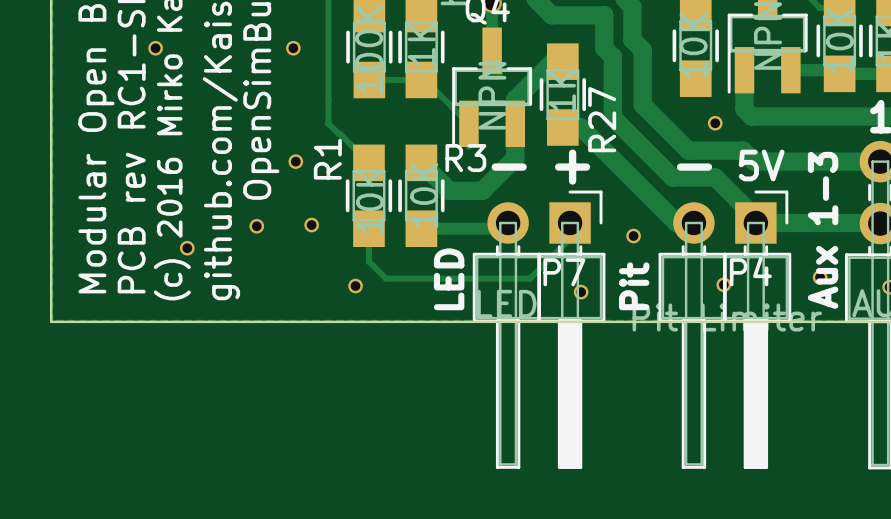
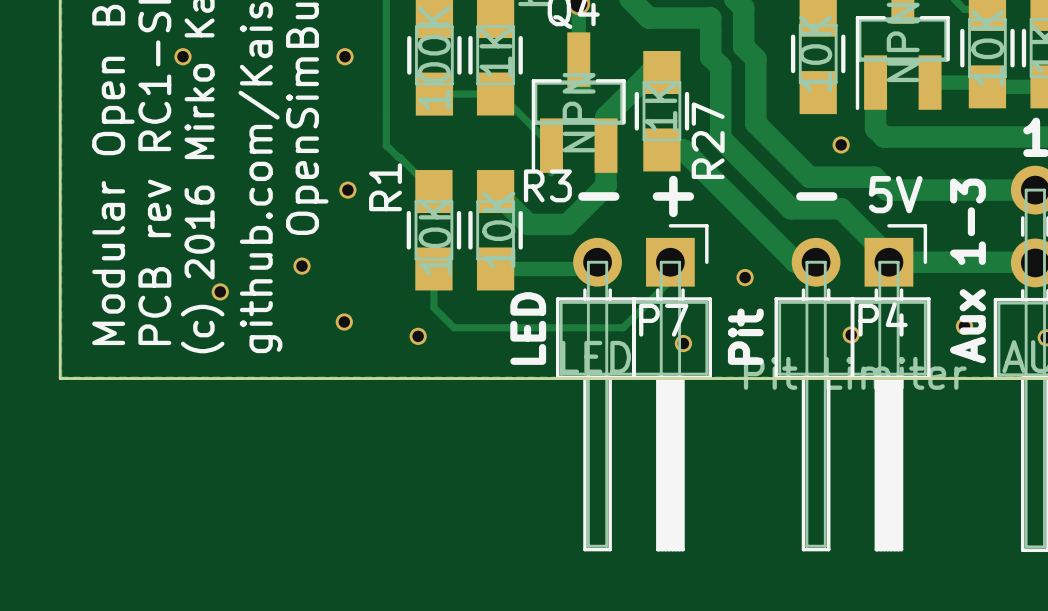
part position: (311, 225) -> (344, 322)

